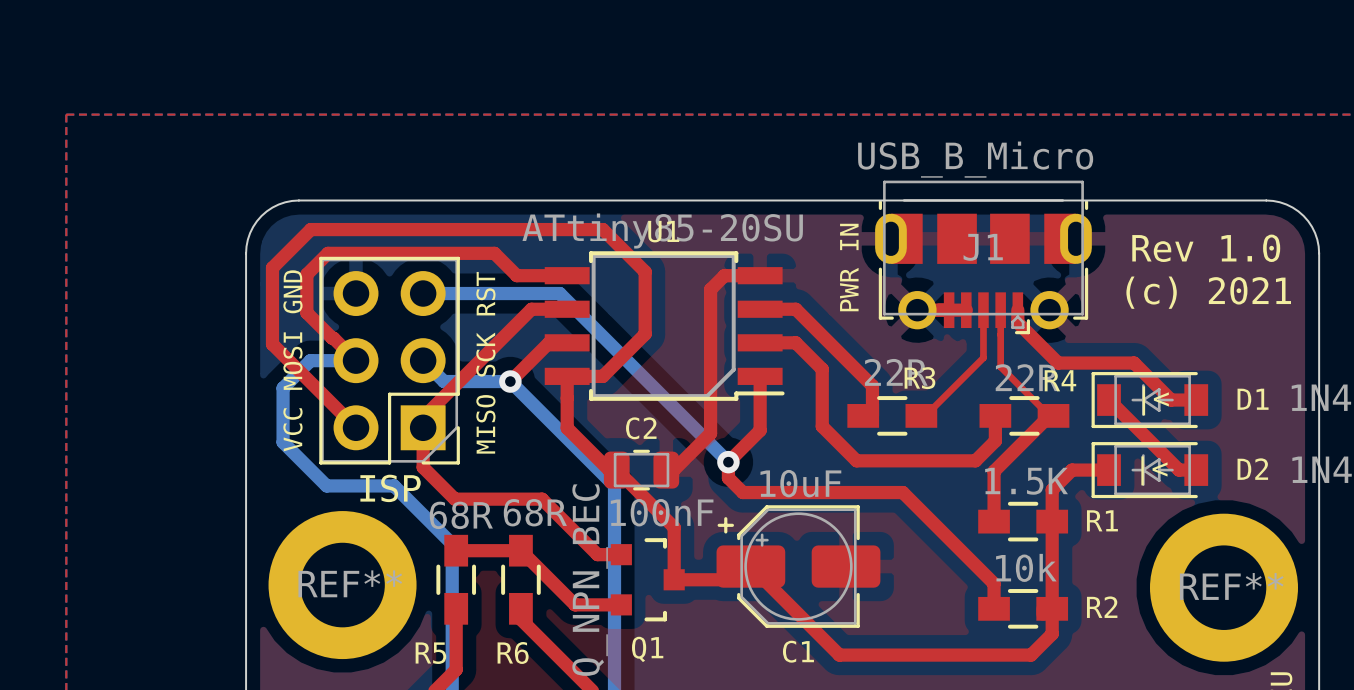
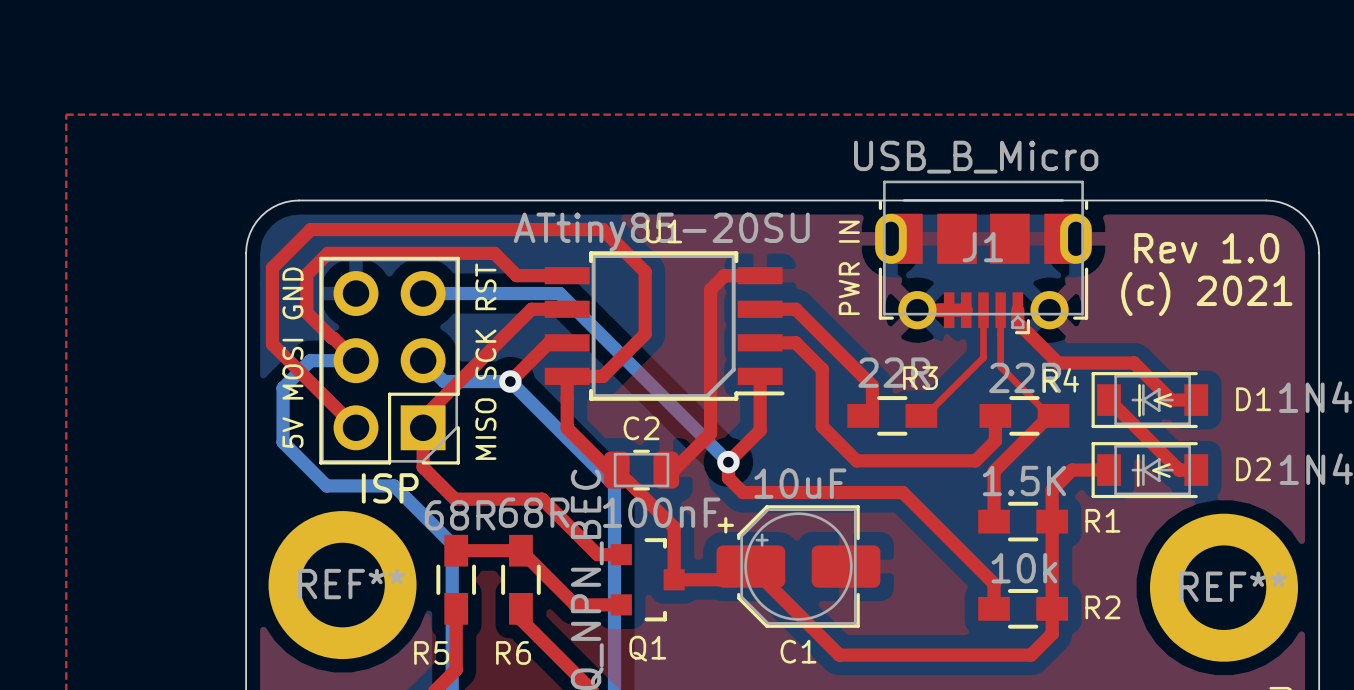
text: VCC MOSI GND (292, 360) -> 5V MOSI GND (292, 357)

